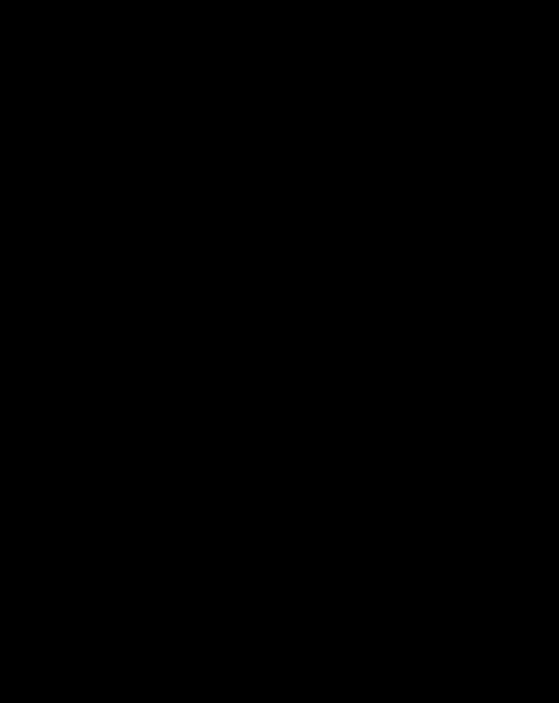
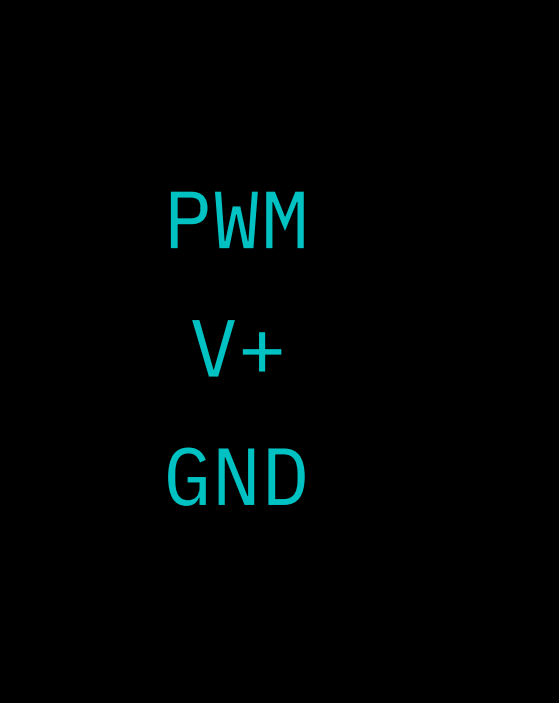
text: none -> PWM (237, 219)
text: none -> V+ (236, 348)
text: none -> GND (236, 476)

